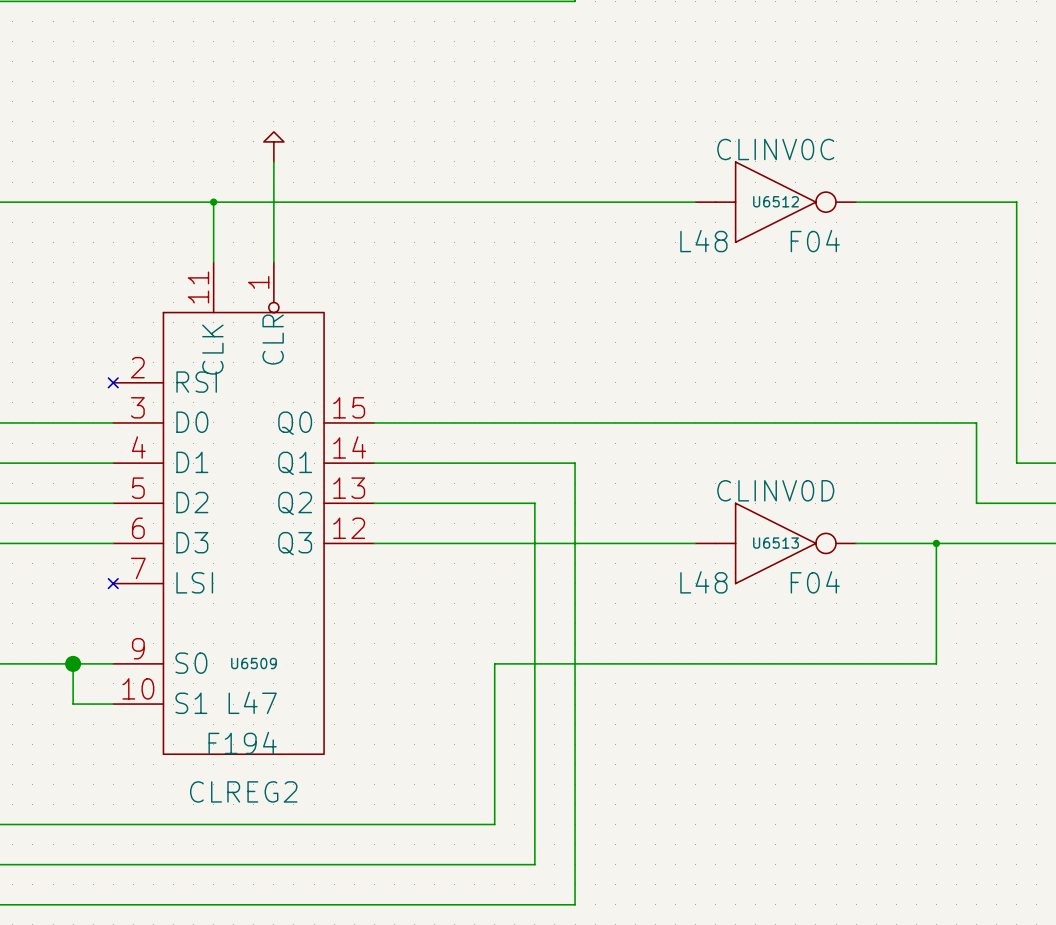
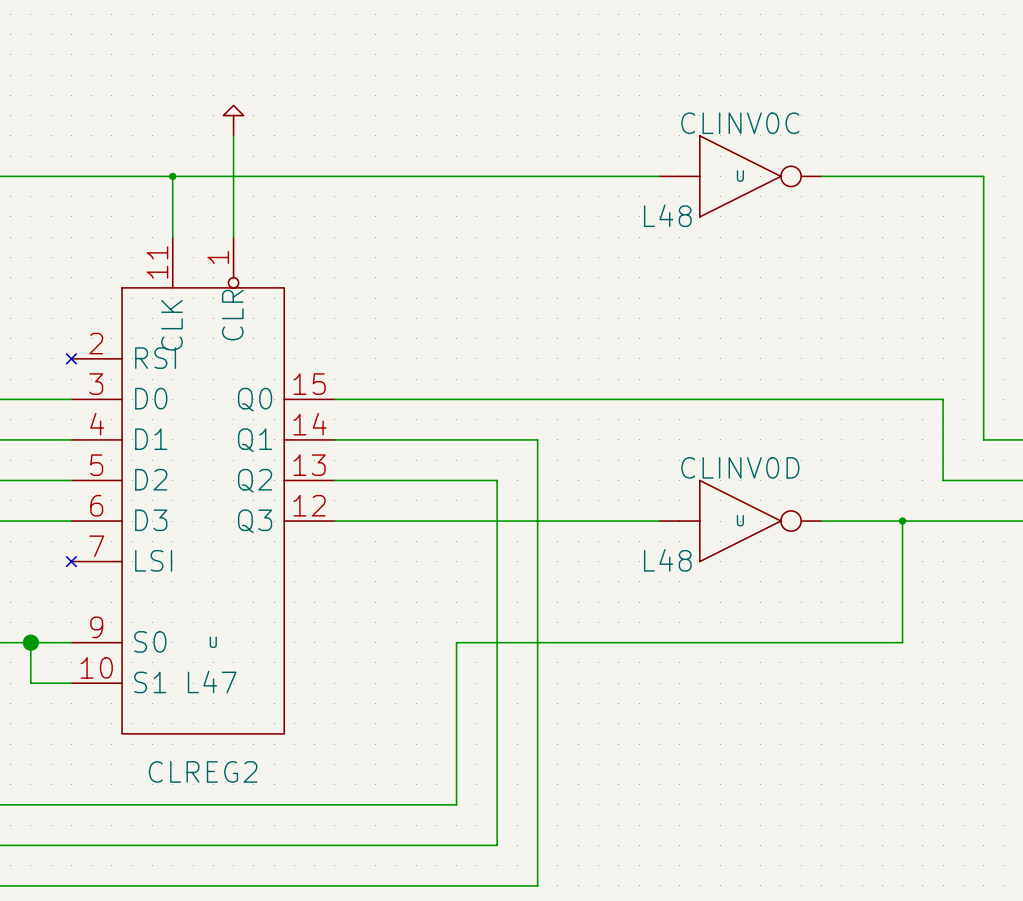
U6512 name: U6512 (776, 201) -> U (740, 176)
U6512 value: F04 (815, 241) -> none
U6513 name: U6513 (776, 543) -> U (740, 520)
U6513 value: F04 (815, 582) -> none
U6509 name: U6509 (254, 663) -> U (213, 642)
U6509 value: F194 (242, 742) -> none

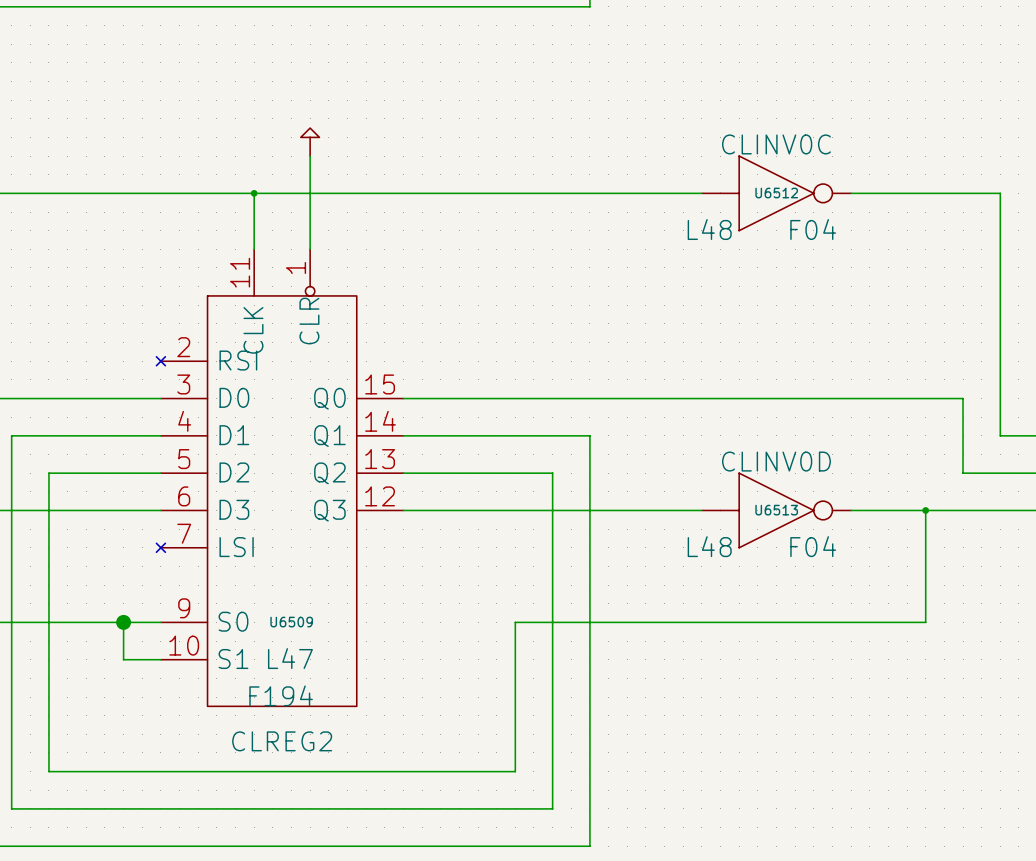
U name: U (740, 176) -> U6512 (776, 193)
U value: none -> F04 (813, 229)
U name: U (740, 520) -> U6513 (776, 510)
U value: none -> F04 (813, 546)
U name: U (213, 642) -> U6509 (291, 622)
U value: none -> F194 (281, 695)

